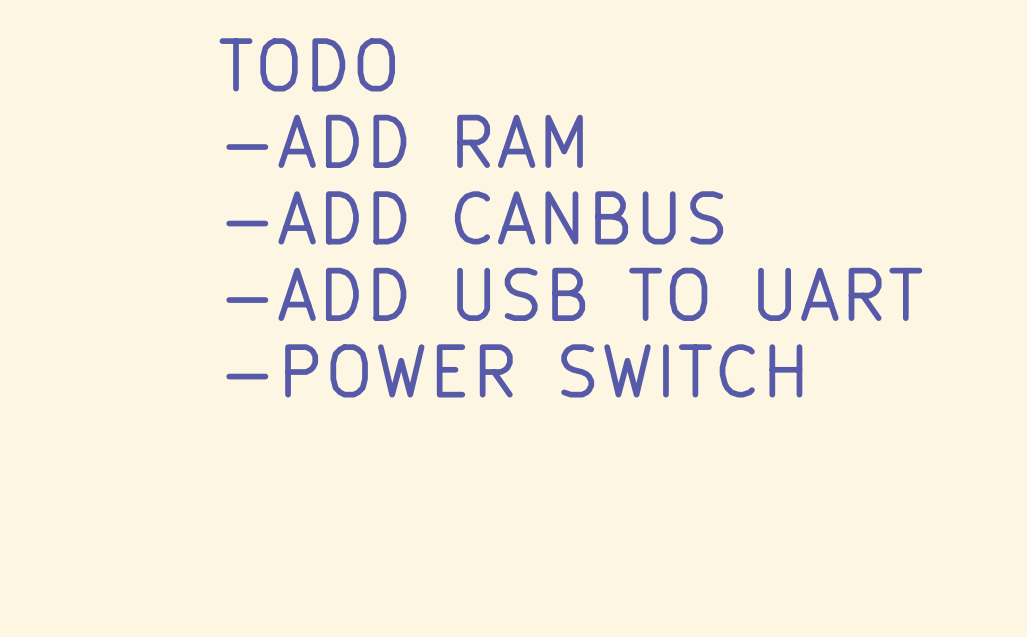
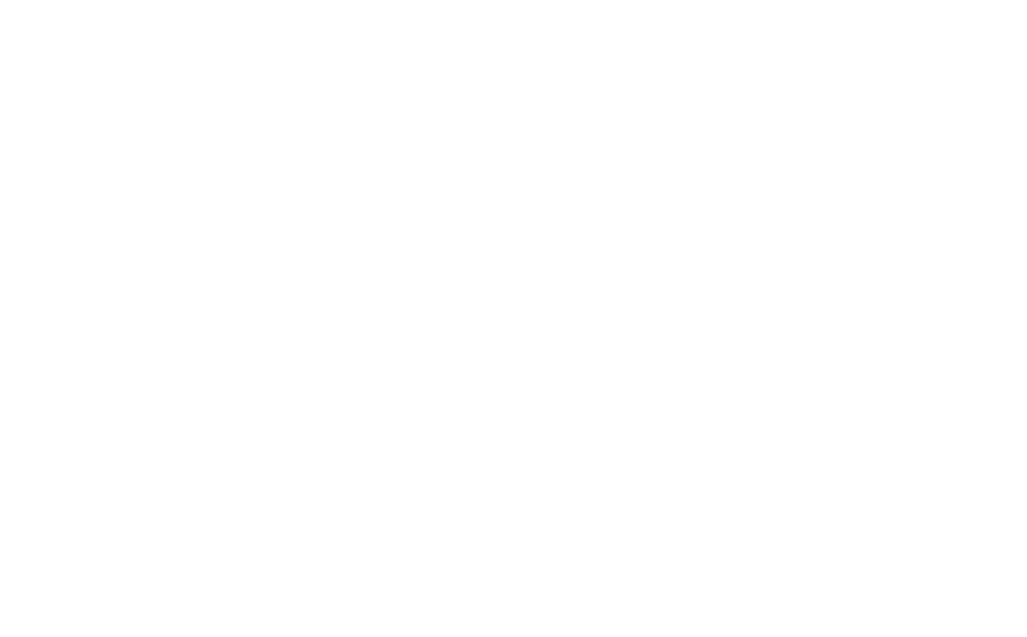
text: TODO (307, 64) -> none
text: -ADD RAM (404, 141) -> none
text: -ADD CANBUS (474, 217) -> none
text: -ADD USB TO UART (574, 294) -> none
text: -POWER SWITCH (514, 370) -> none

